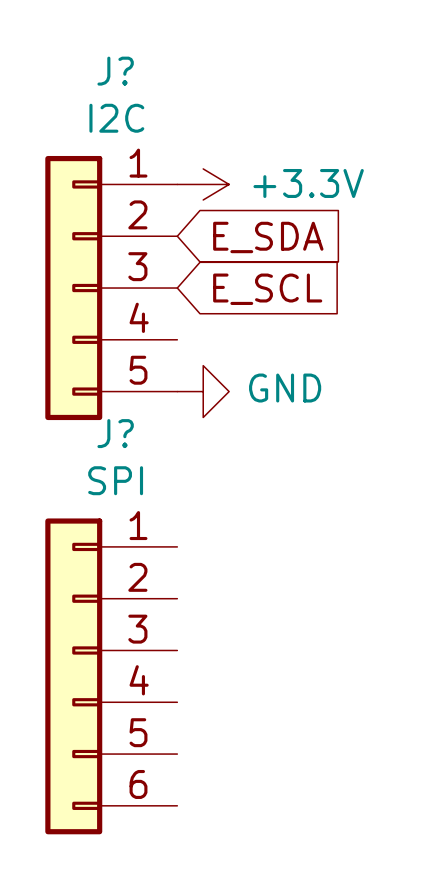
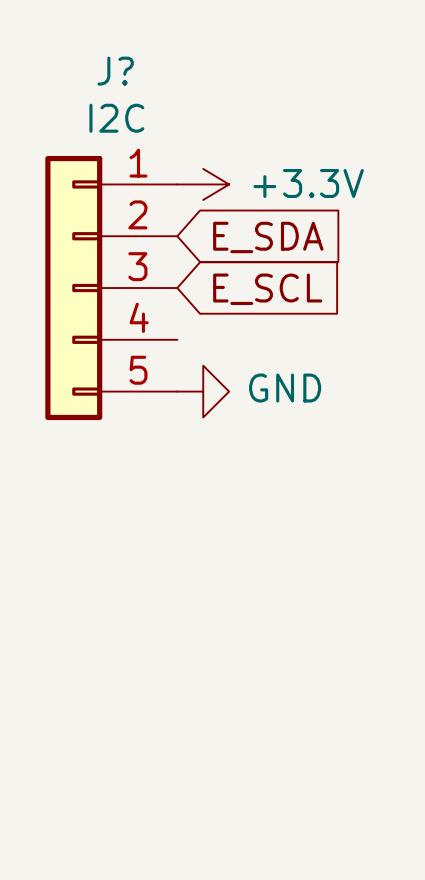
J?: SPI (111, 676) -> none

